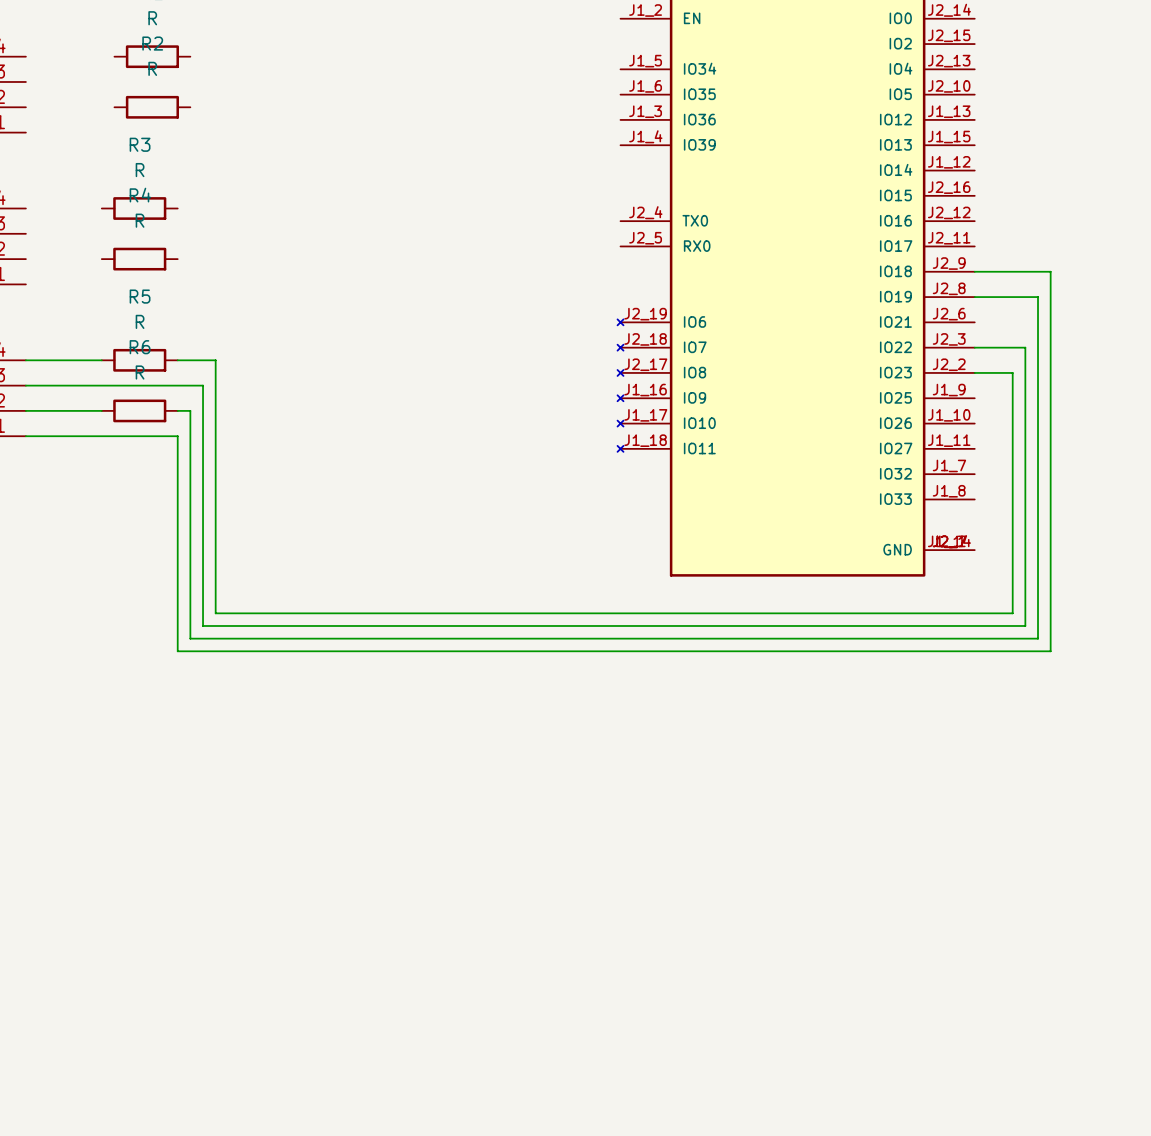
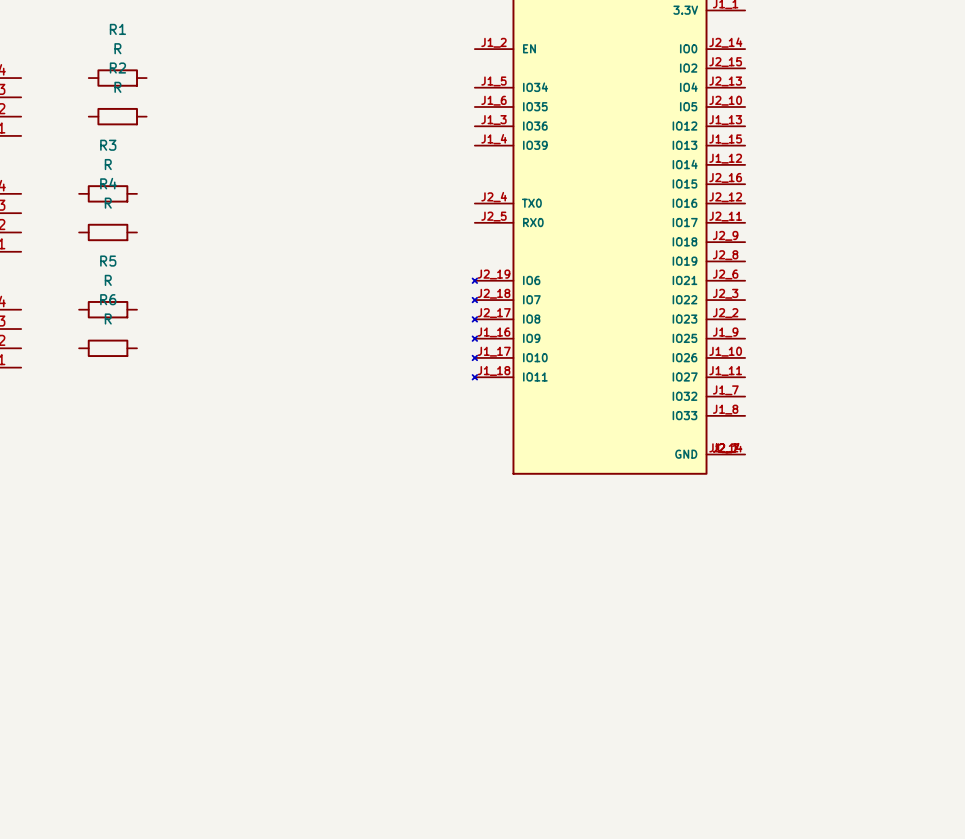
wire: (974, 271) (1050, 271) (1050, 651) (177, 651) (177, 436) (25, 436) -> none
wire: (974, 297) (1038, 297) (1038, 638) (190, 638) (190, 410) (177, 410) -> none
wire: (974, 347) (1025, 347) (1025, 625) (203, 625) (203, 385) (25, 385) -> none
wire: (25, 360) (101, 360) -> none
wire: (177, 360) (215, 360) (215, 613) (1012, 613) (1012, 372) (974, 372) -> none
wire: (25, 410) (101, 410) -> none

